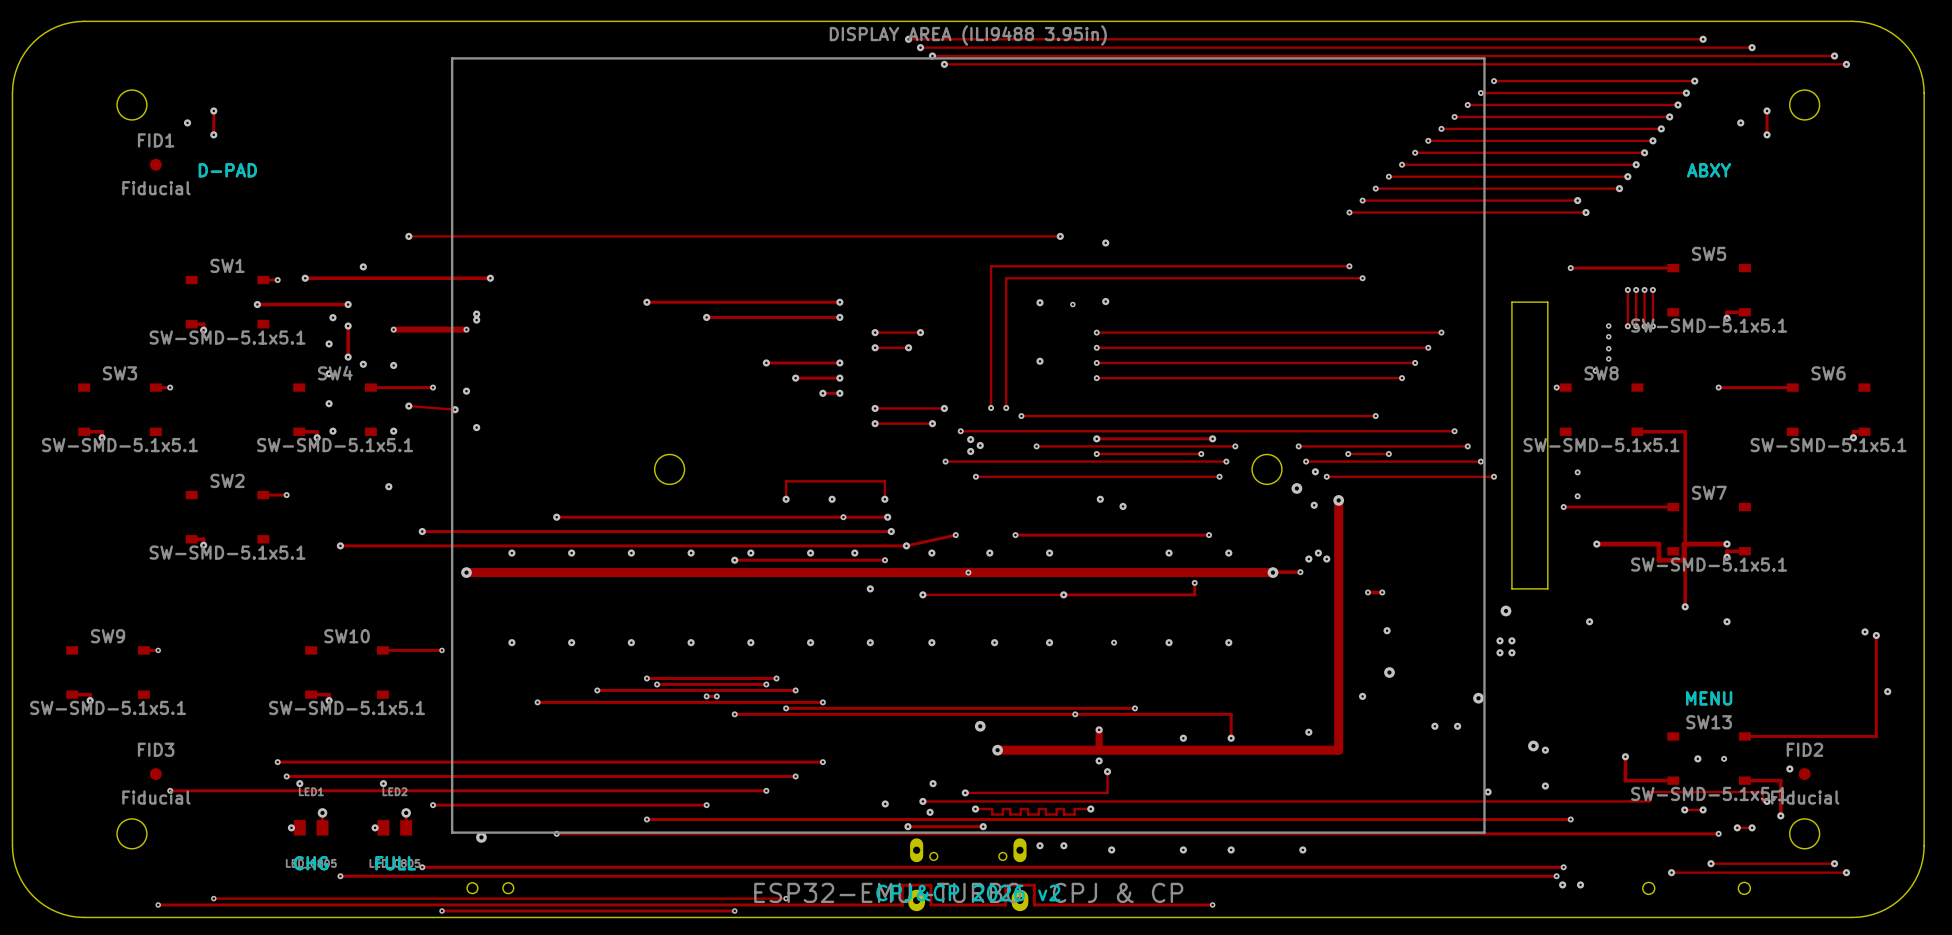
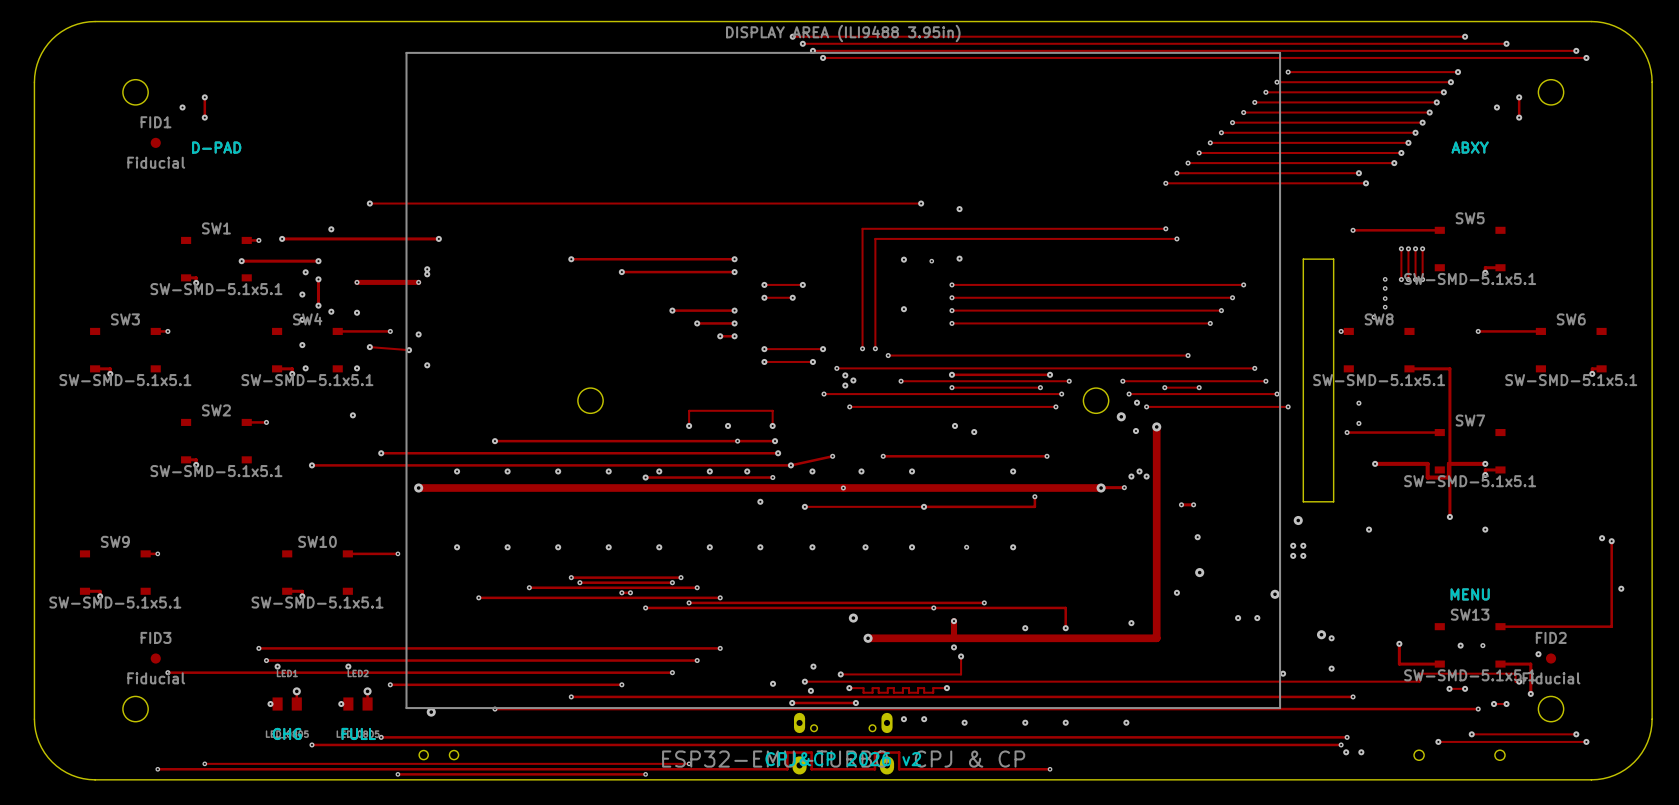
via: (1228, 553) -> none
via: (1228, 642) -> none

